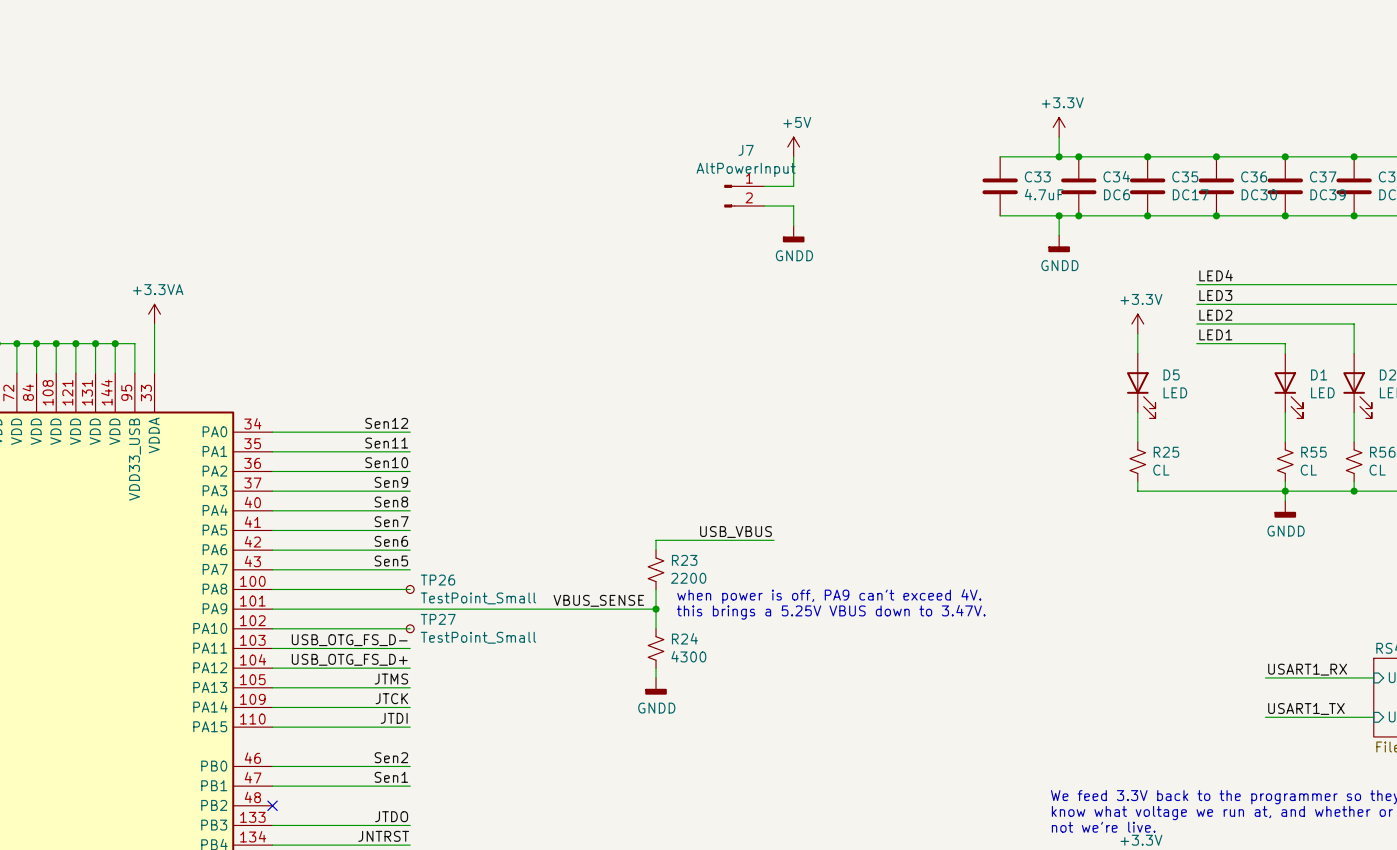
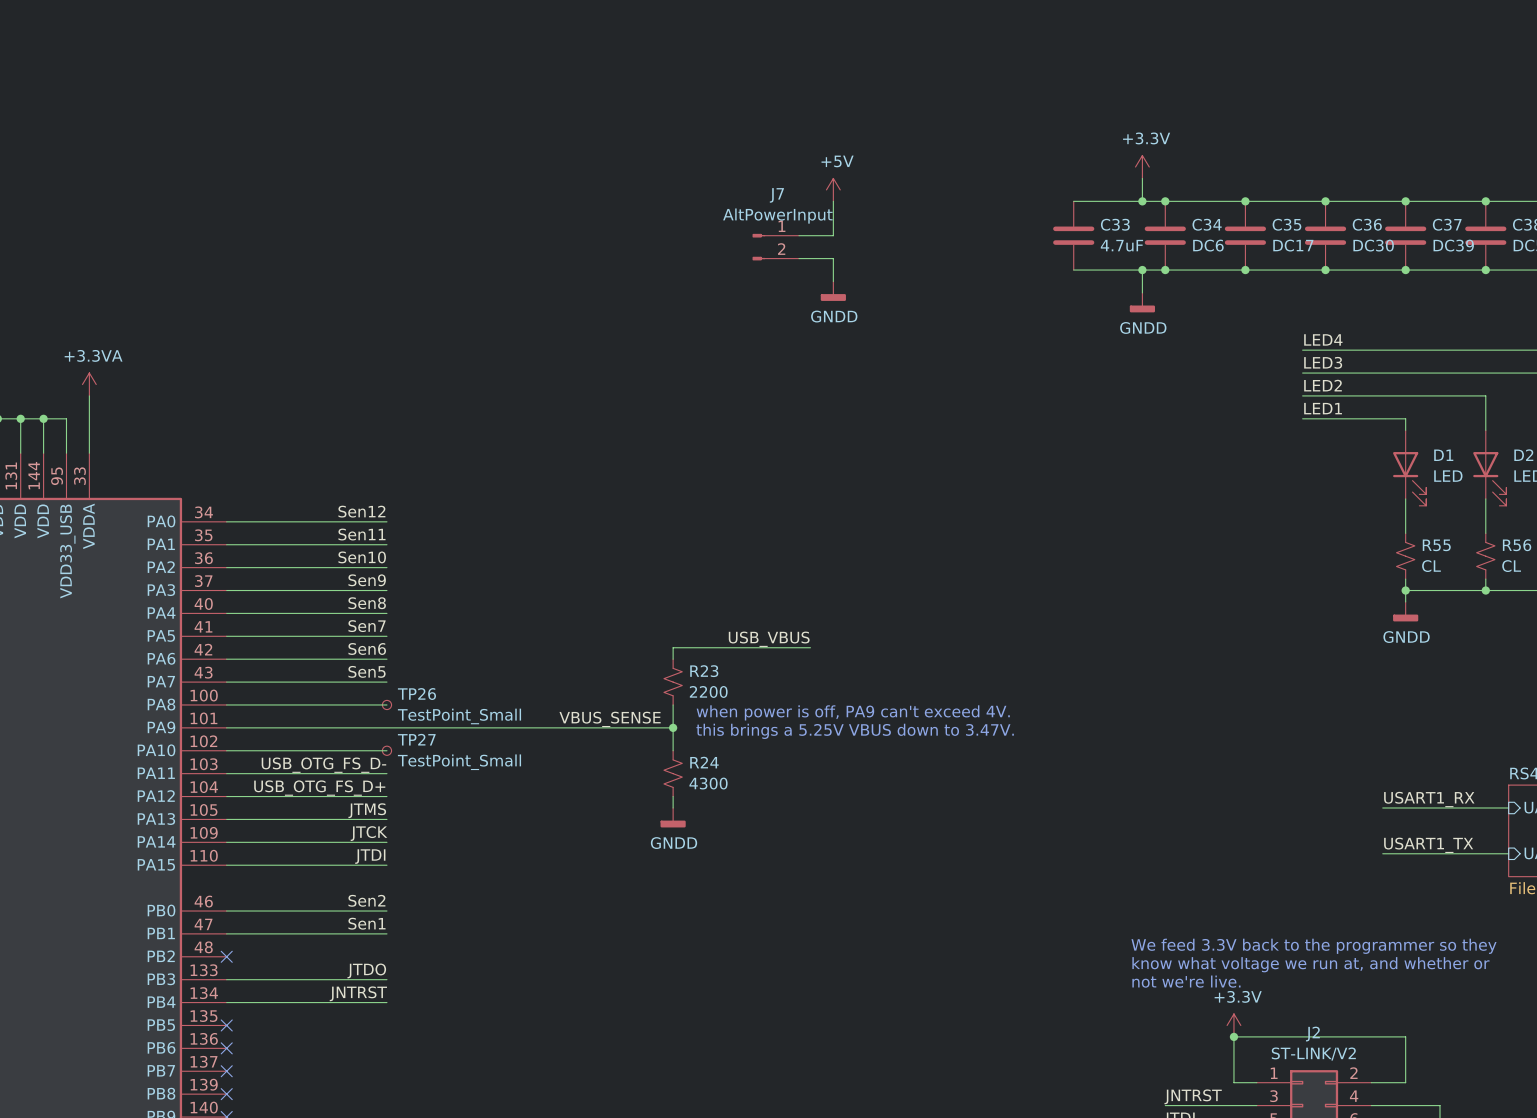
power symbol: +3.3V (1137, 323) -> none
wire: (1137, 333) (1137, 353) -> none
D5: LED (1141, 385) -> none
wire: (1137, 412) (1137, 441) -> none
R25: CL (1137, 461) -> none
wire: (1137, 481) (1137, 491) (1285, 491) -> none

